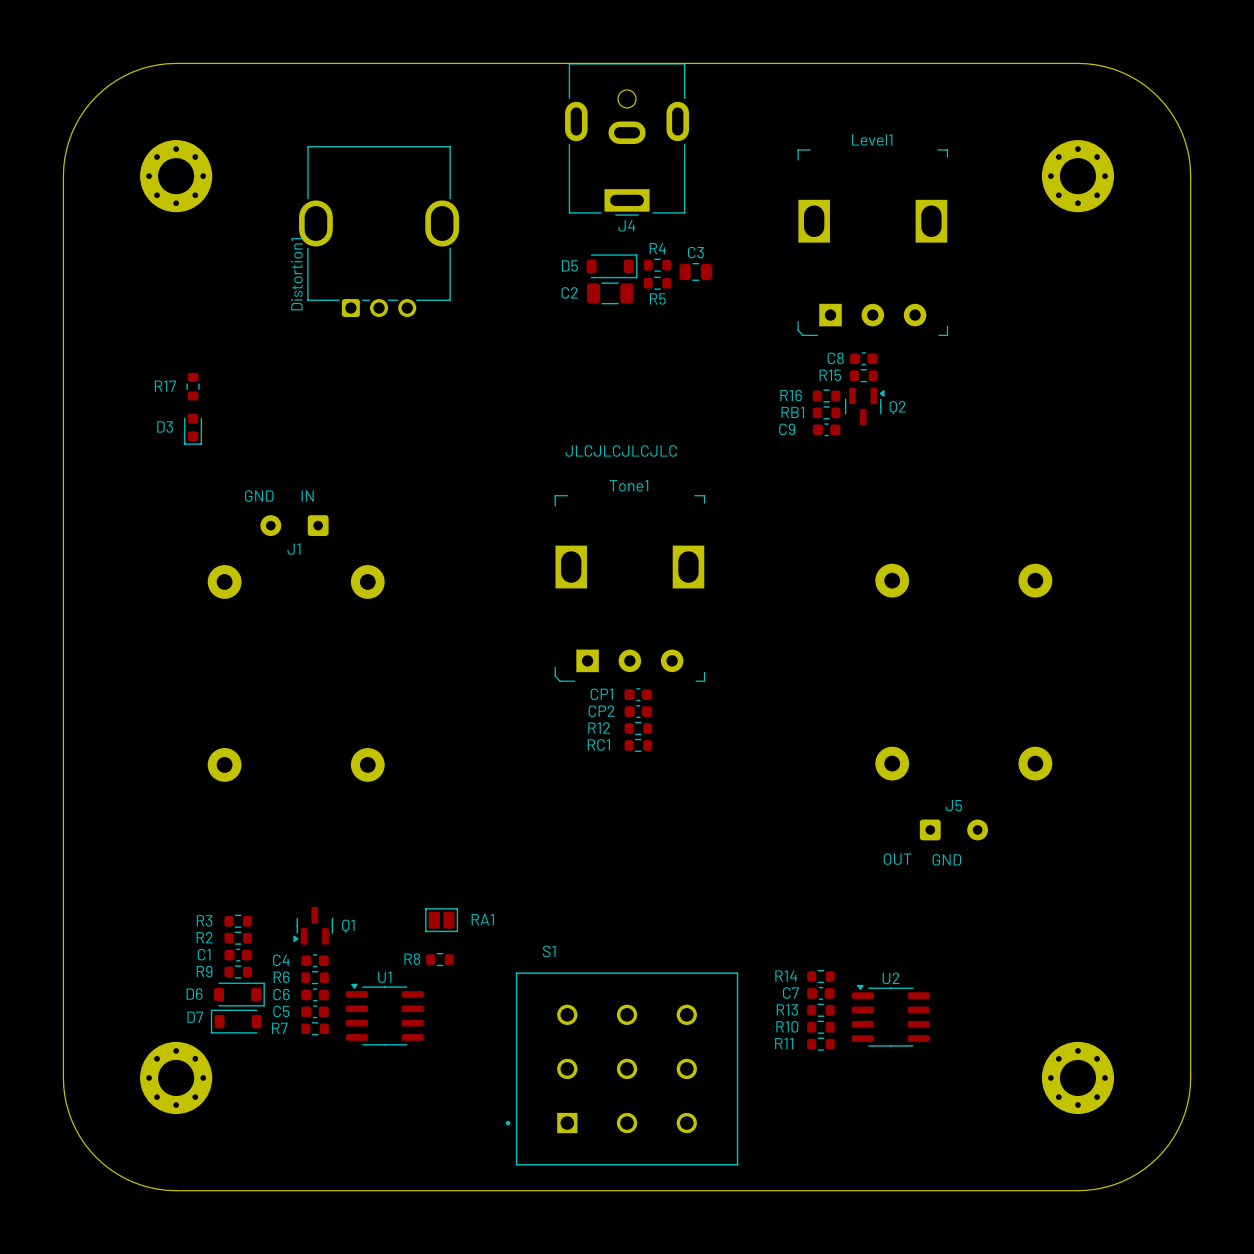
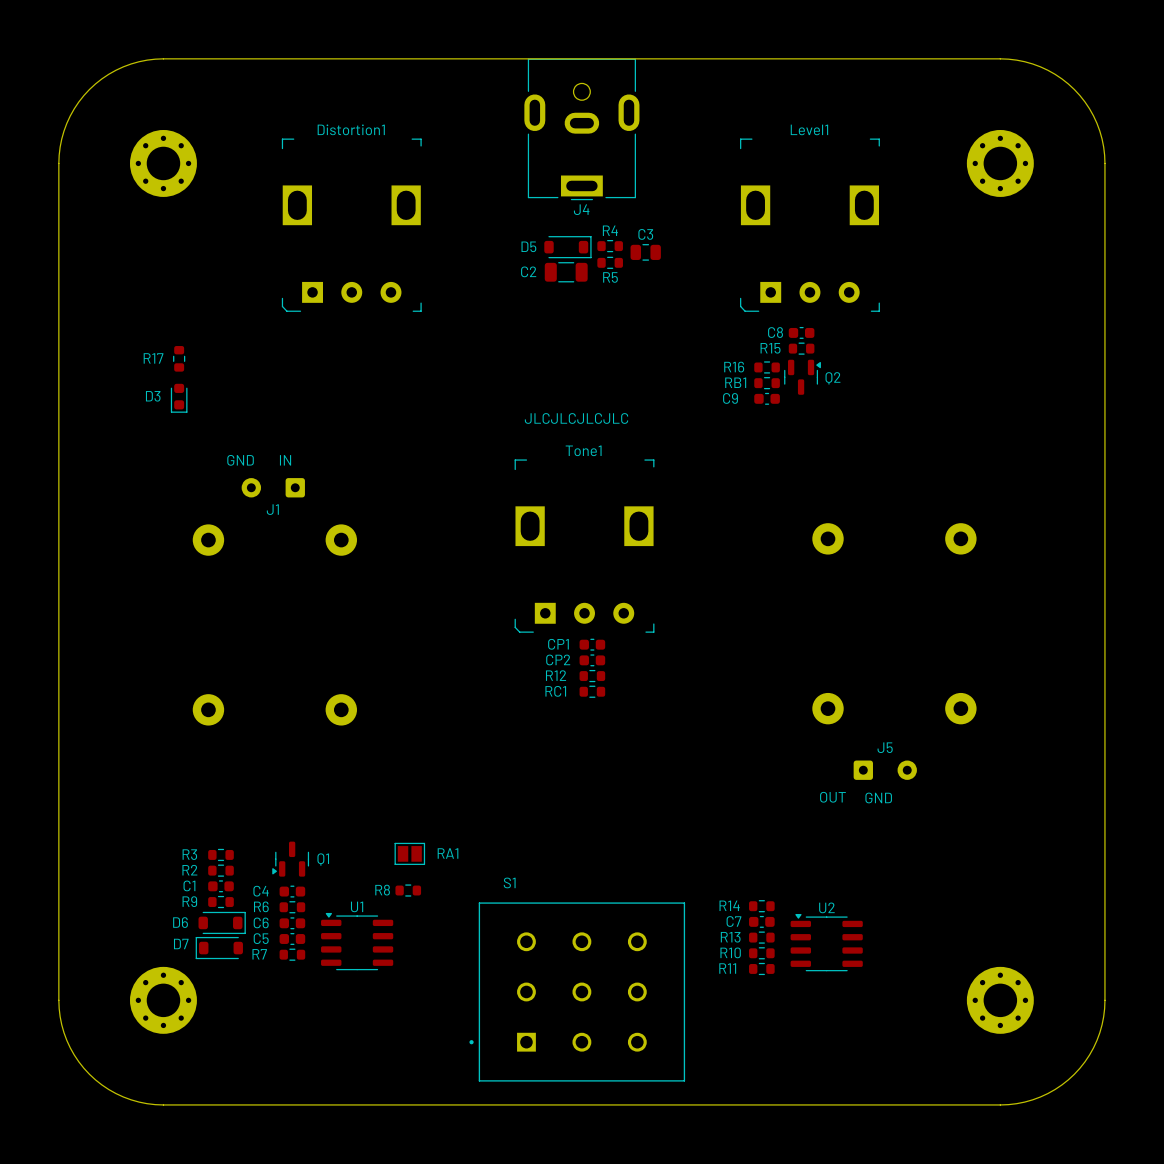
Distortion1 footprint: [299, 146, 460, 318] -> [281, 138, 422, 312]
Distortion1 name position: Distortion1 (296, 274) -> Distortion1 (351, 129)

